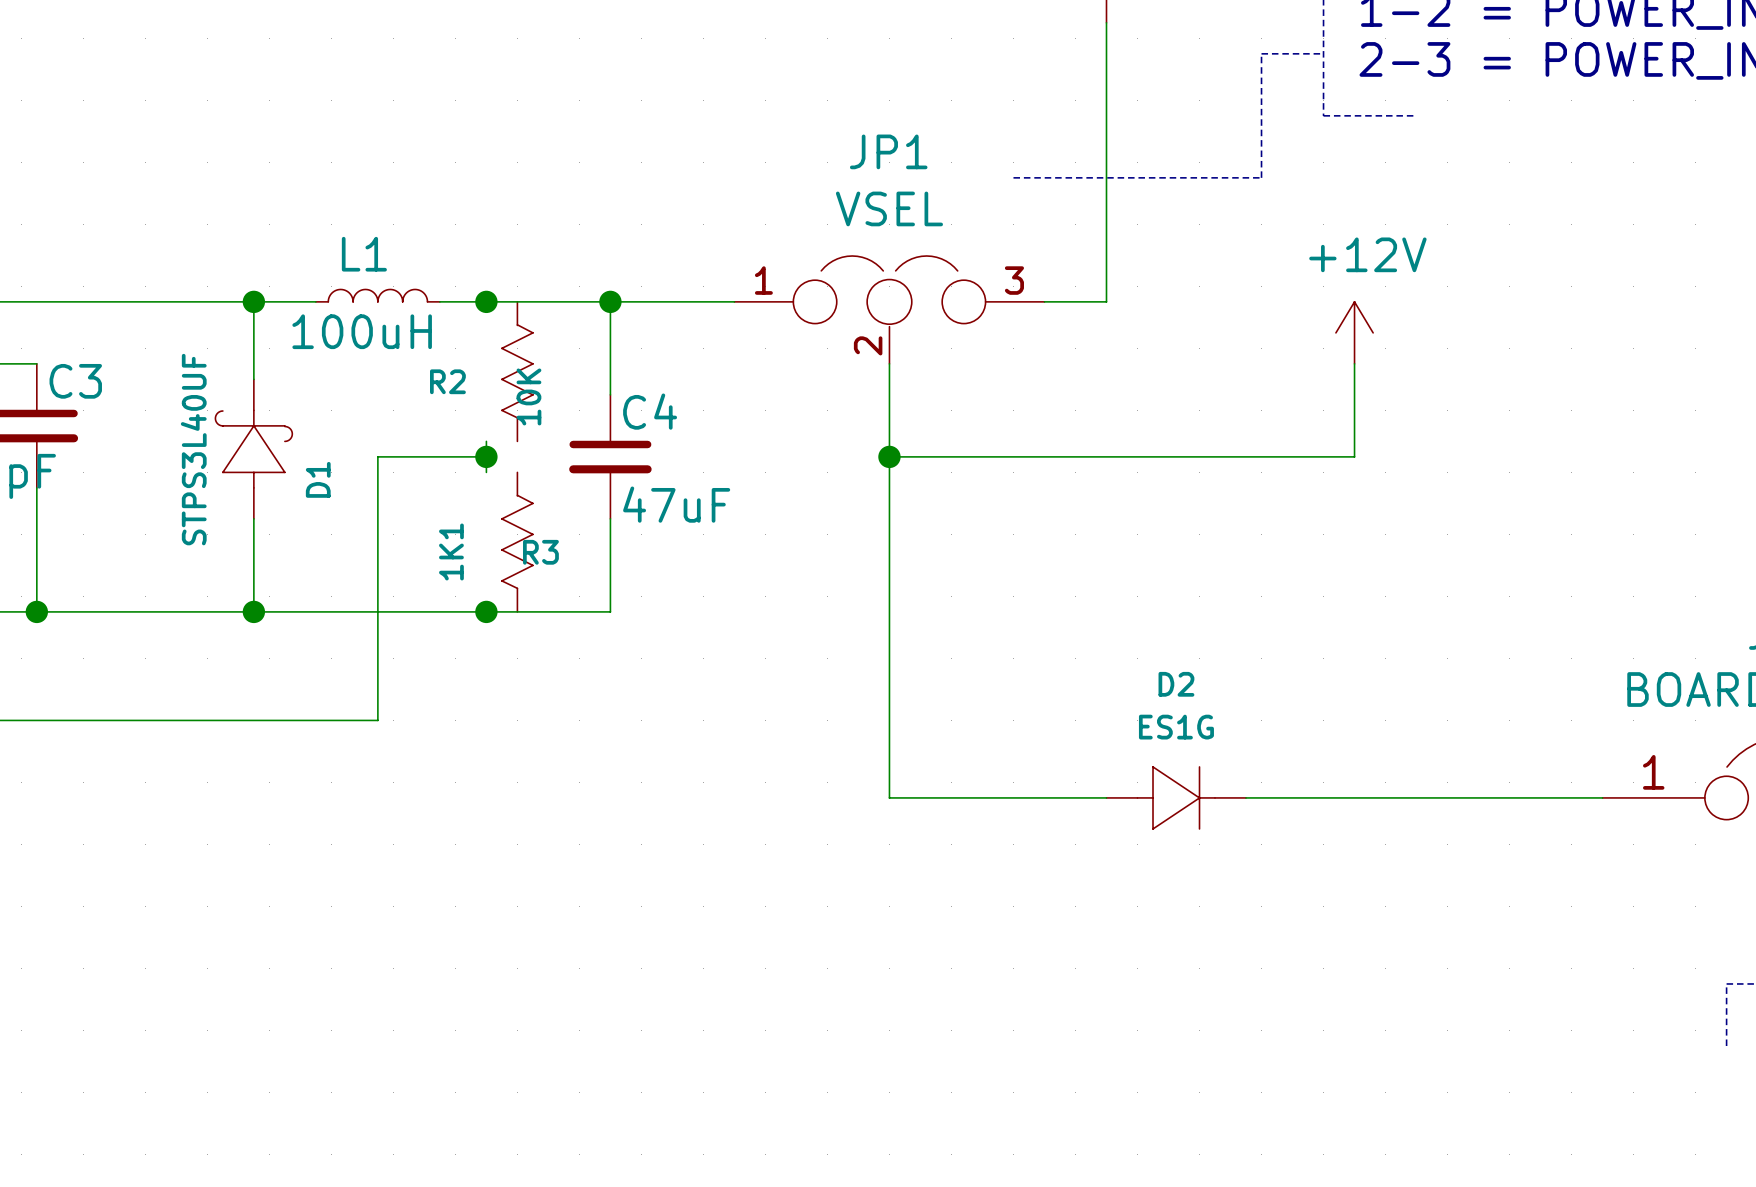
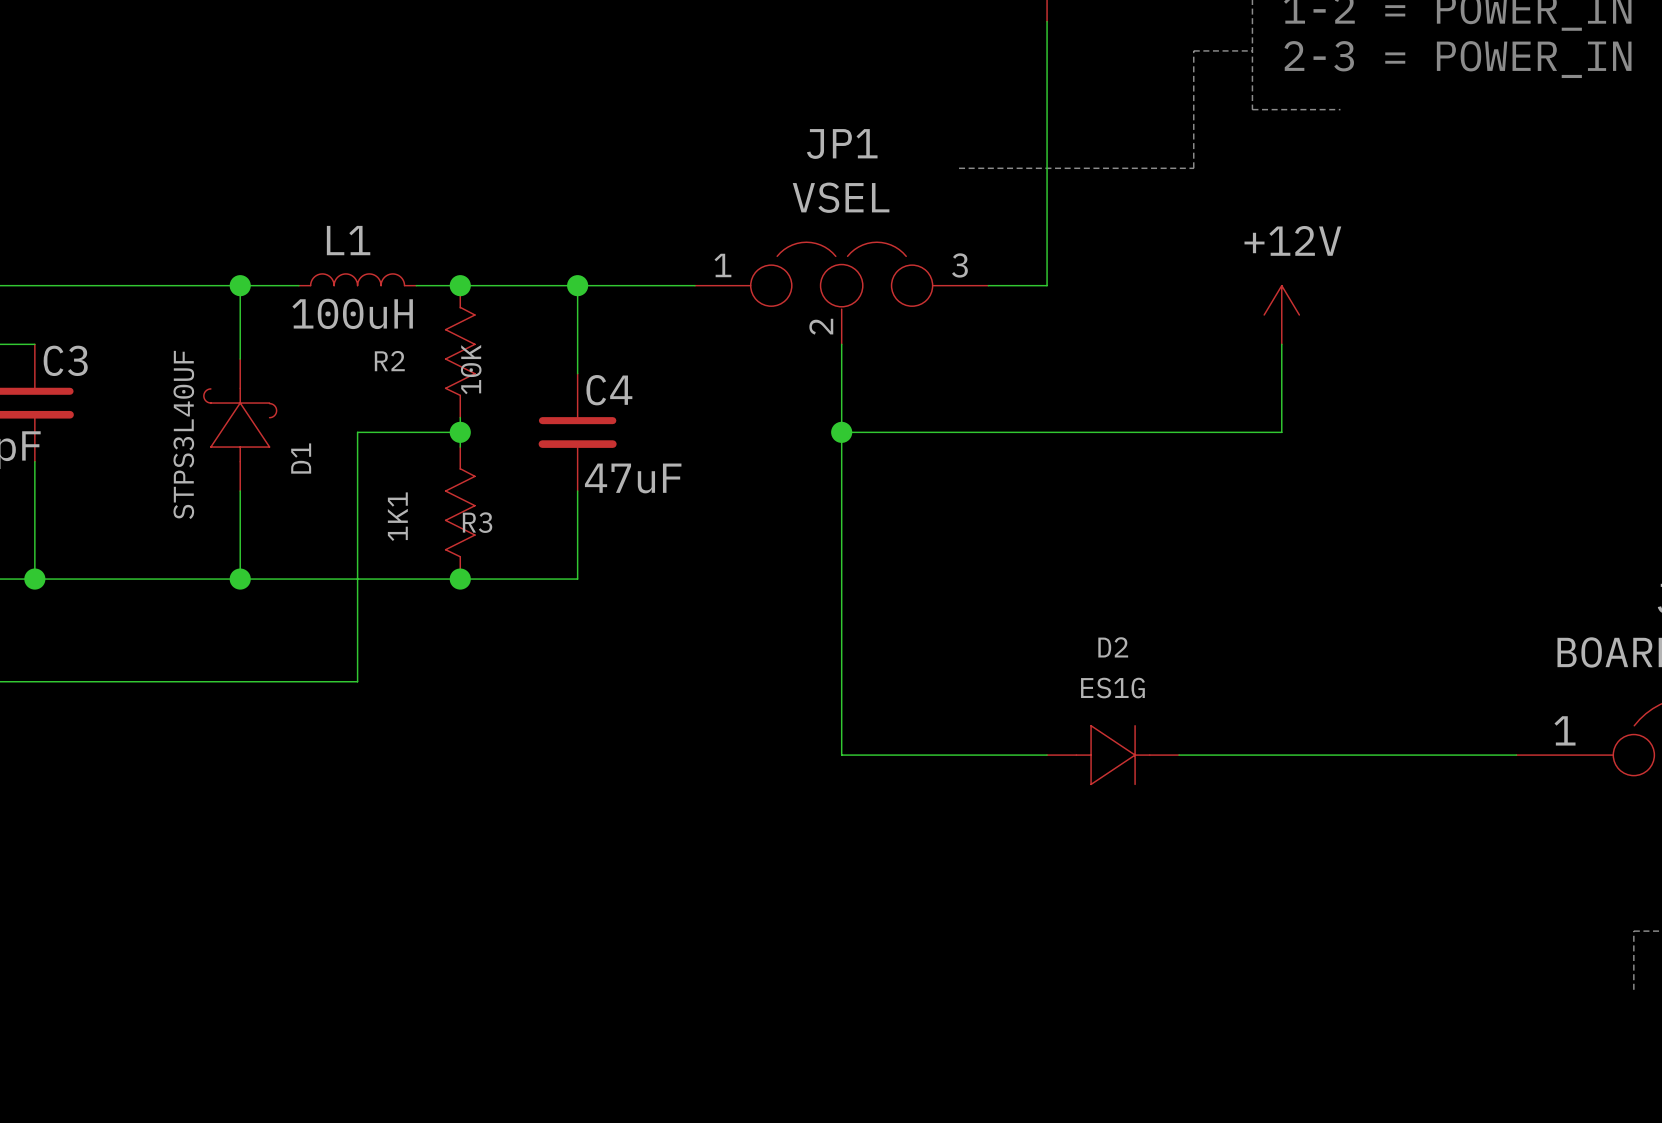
R2 position: (517, 371) -> (460, 351)
R3 position: (517, 542) -> (460, 513)

